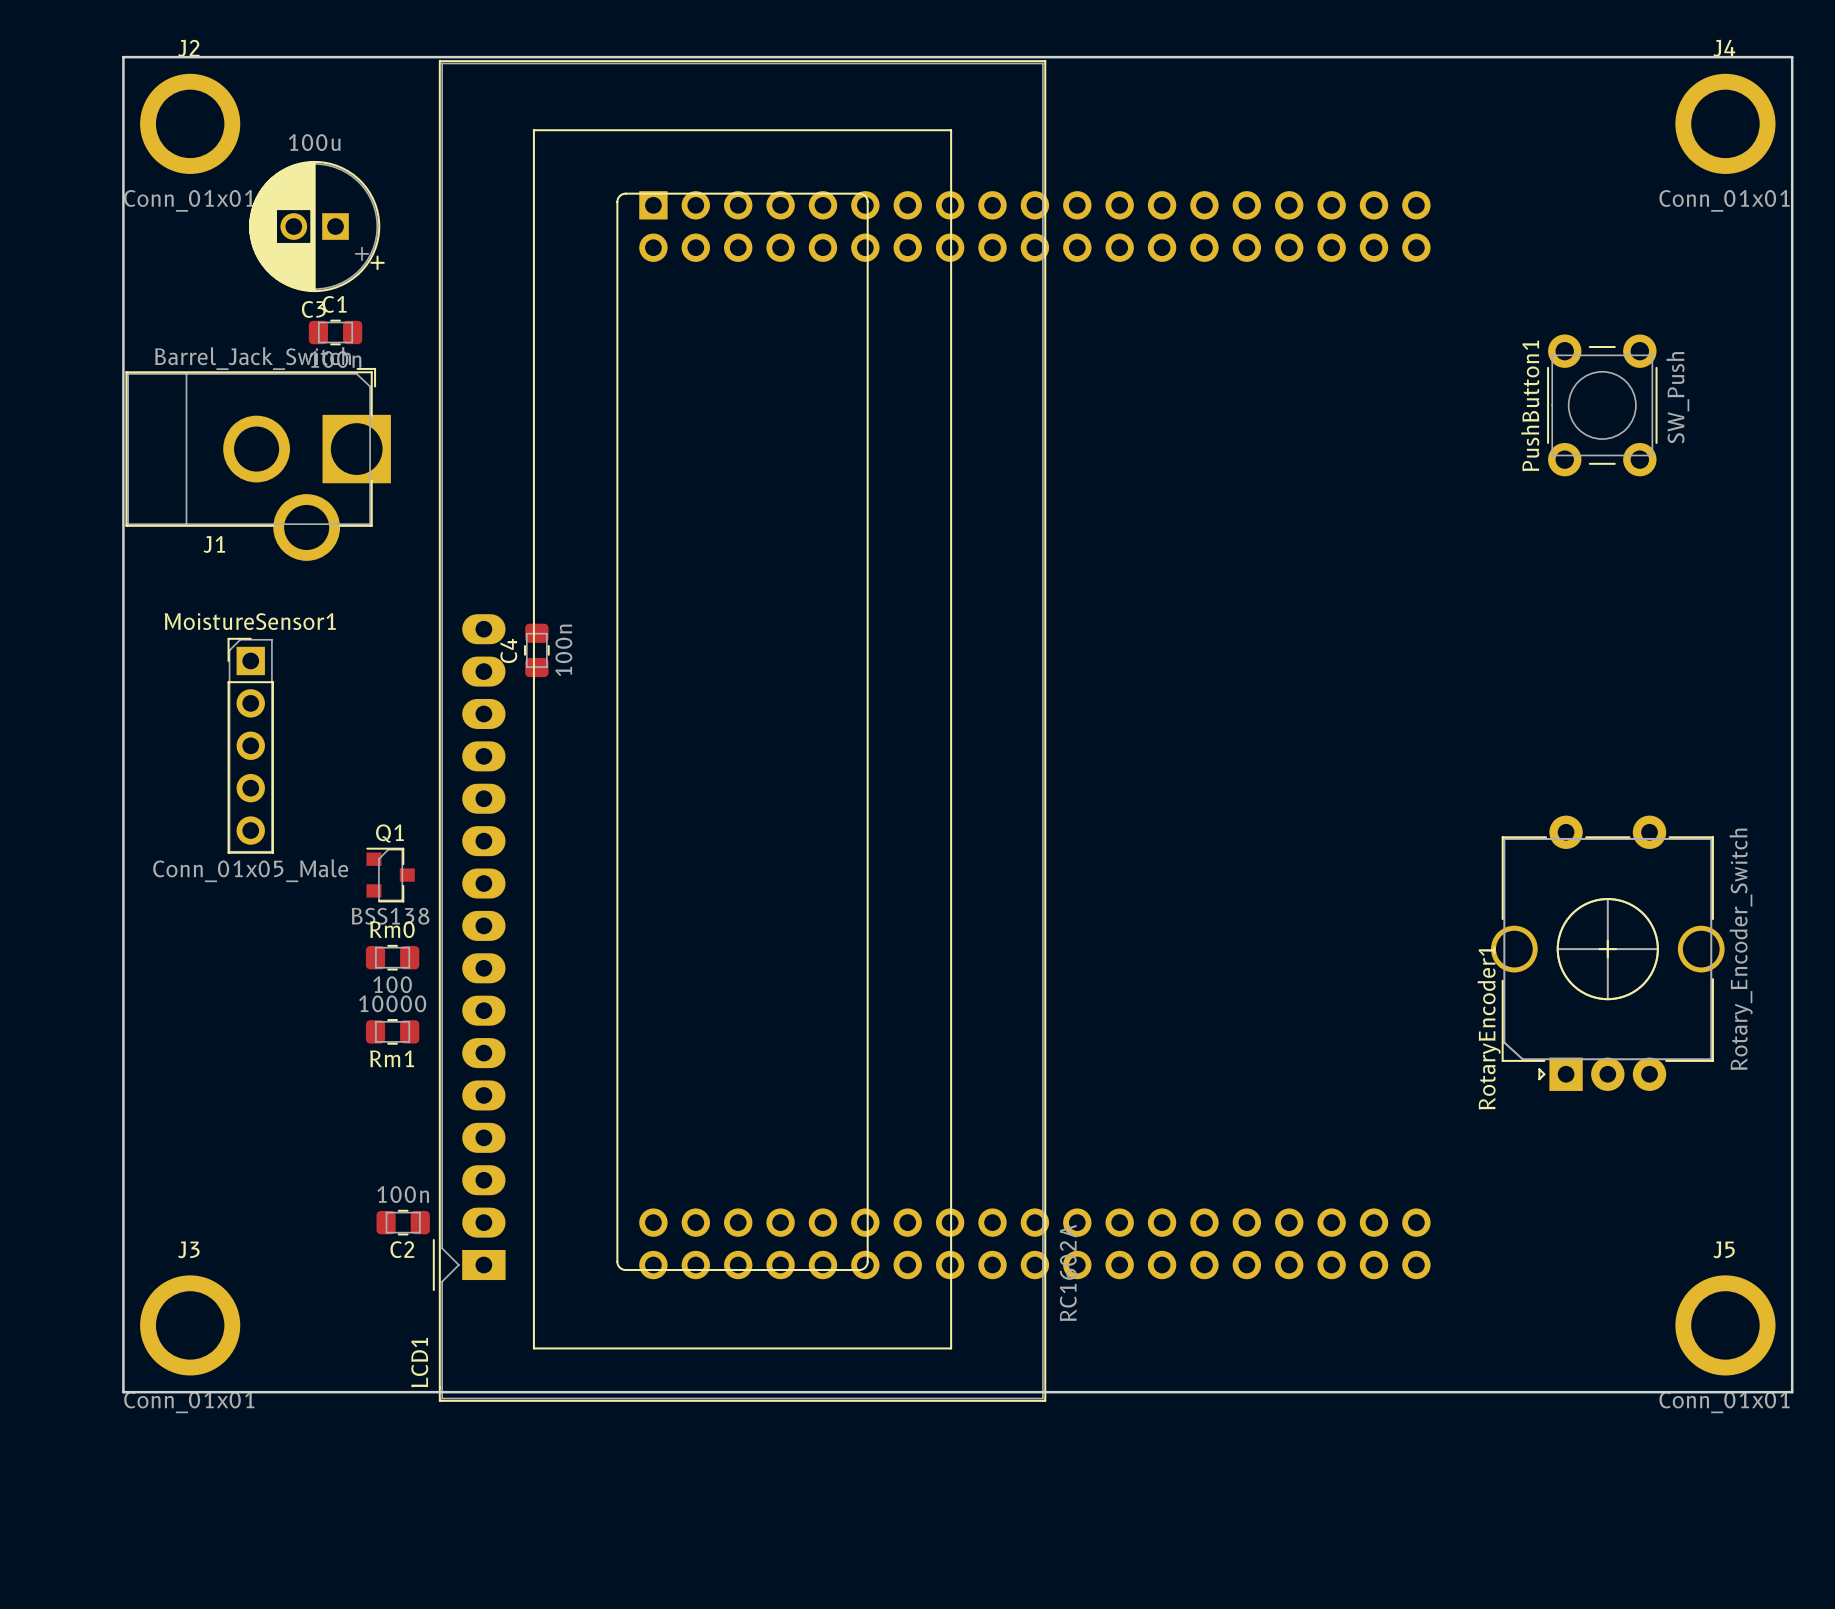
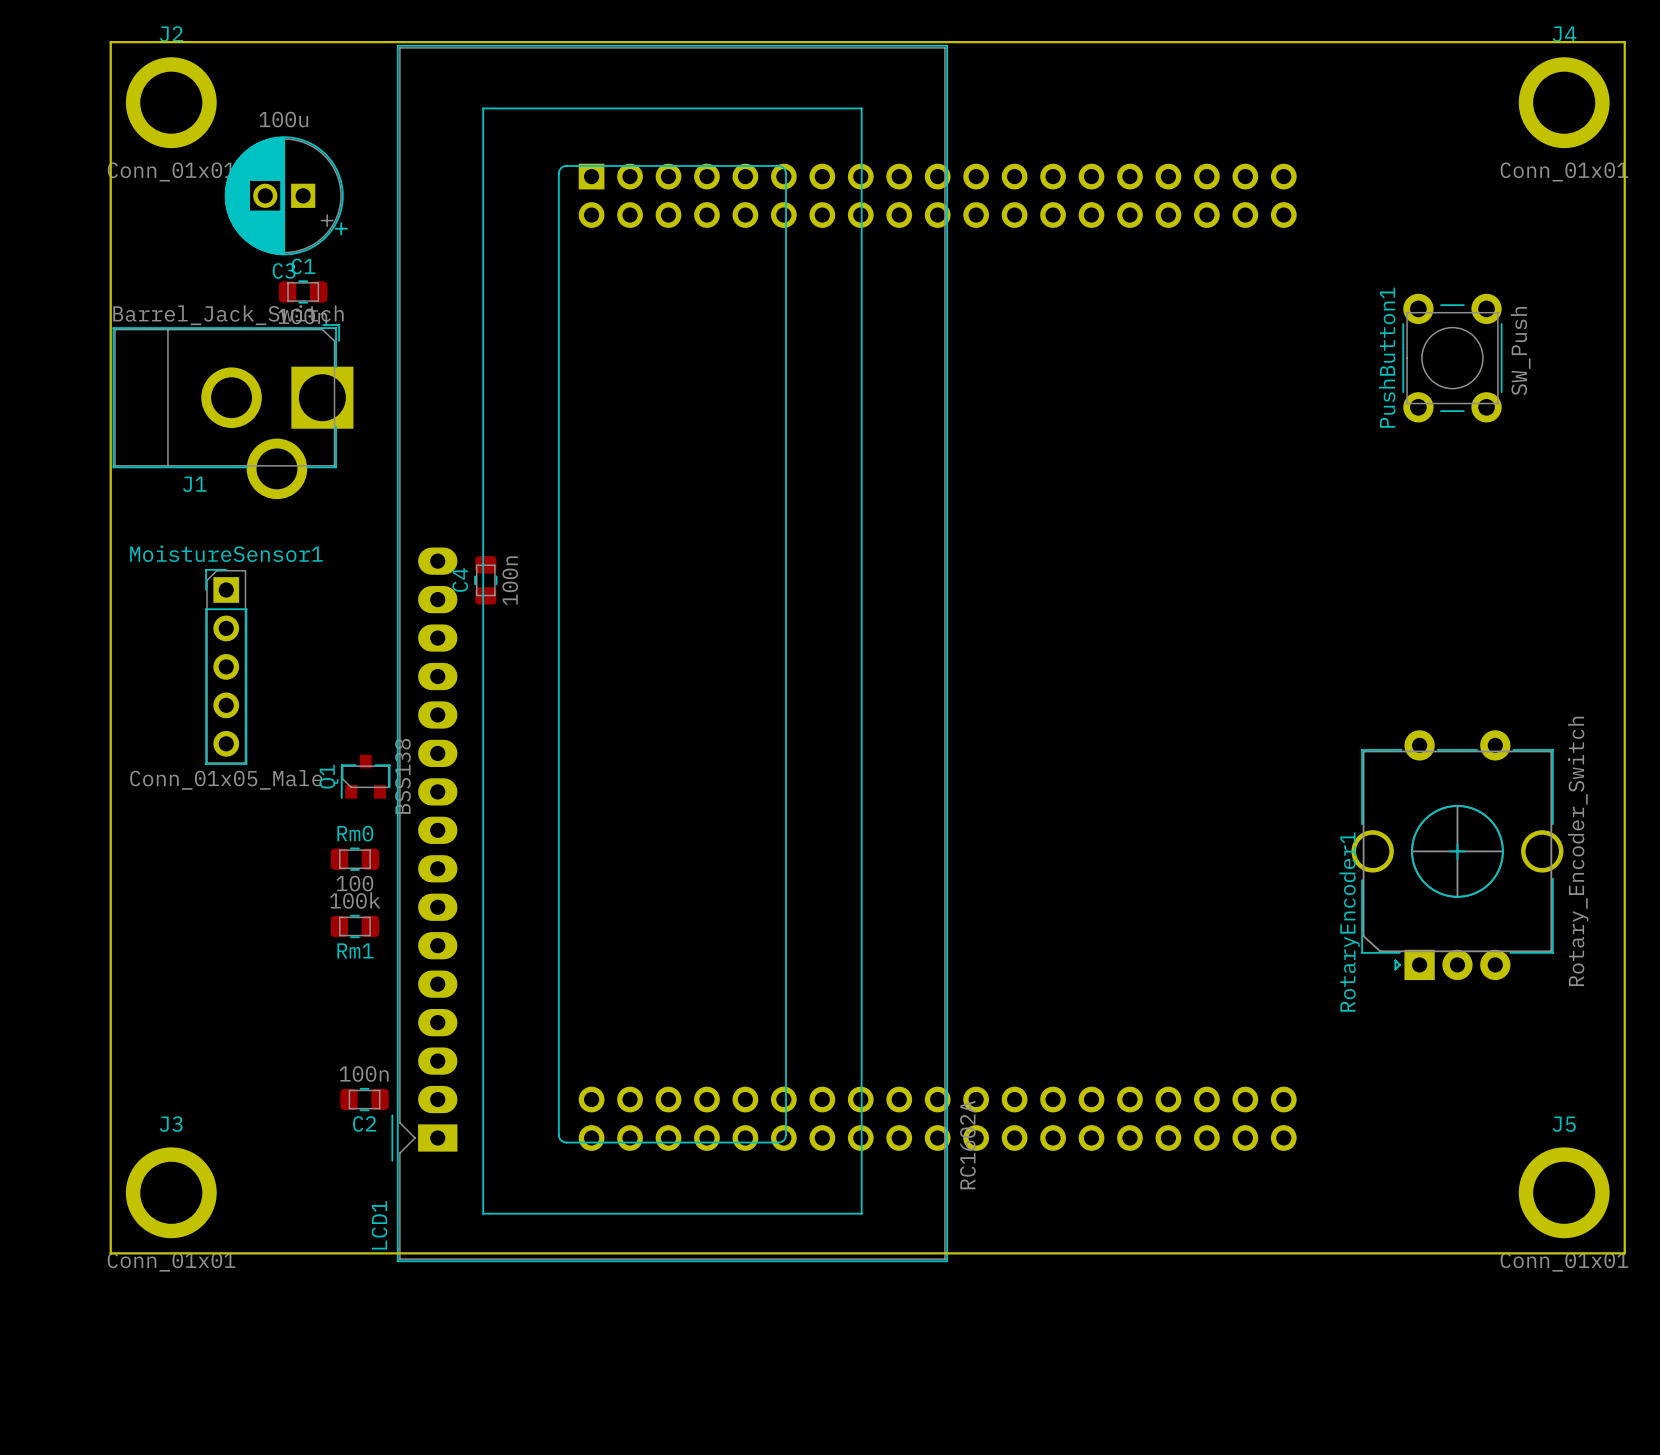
Q1 rotation: 0° (390, 875) -> 90° counterclockwise (365, 776)
Rm1 value: 10000 (392, 1003) -> 100k (355, 900)

